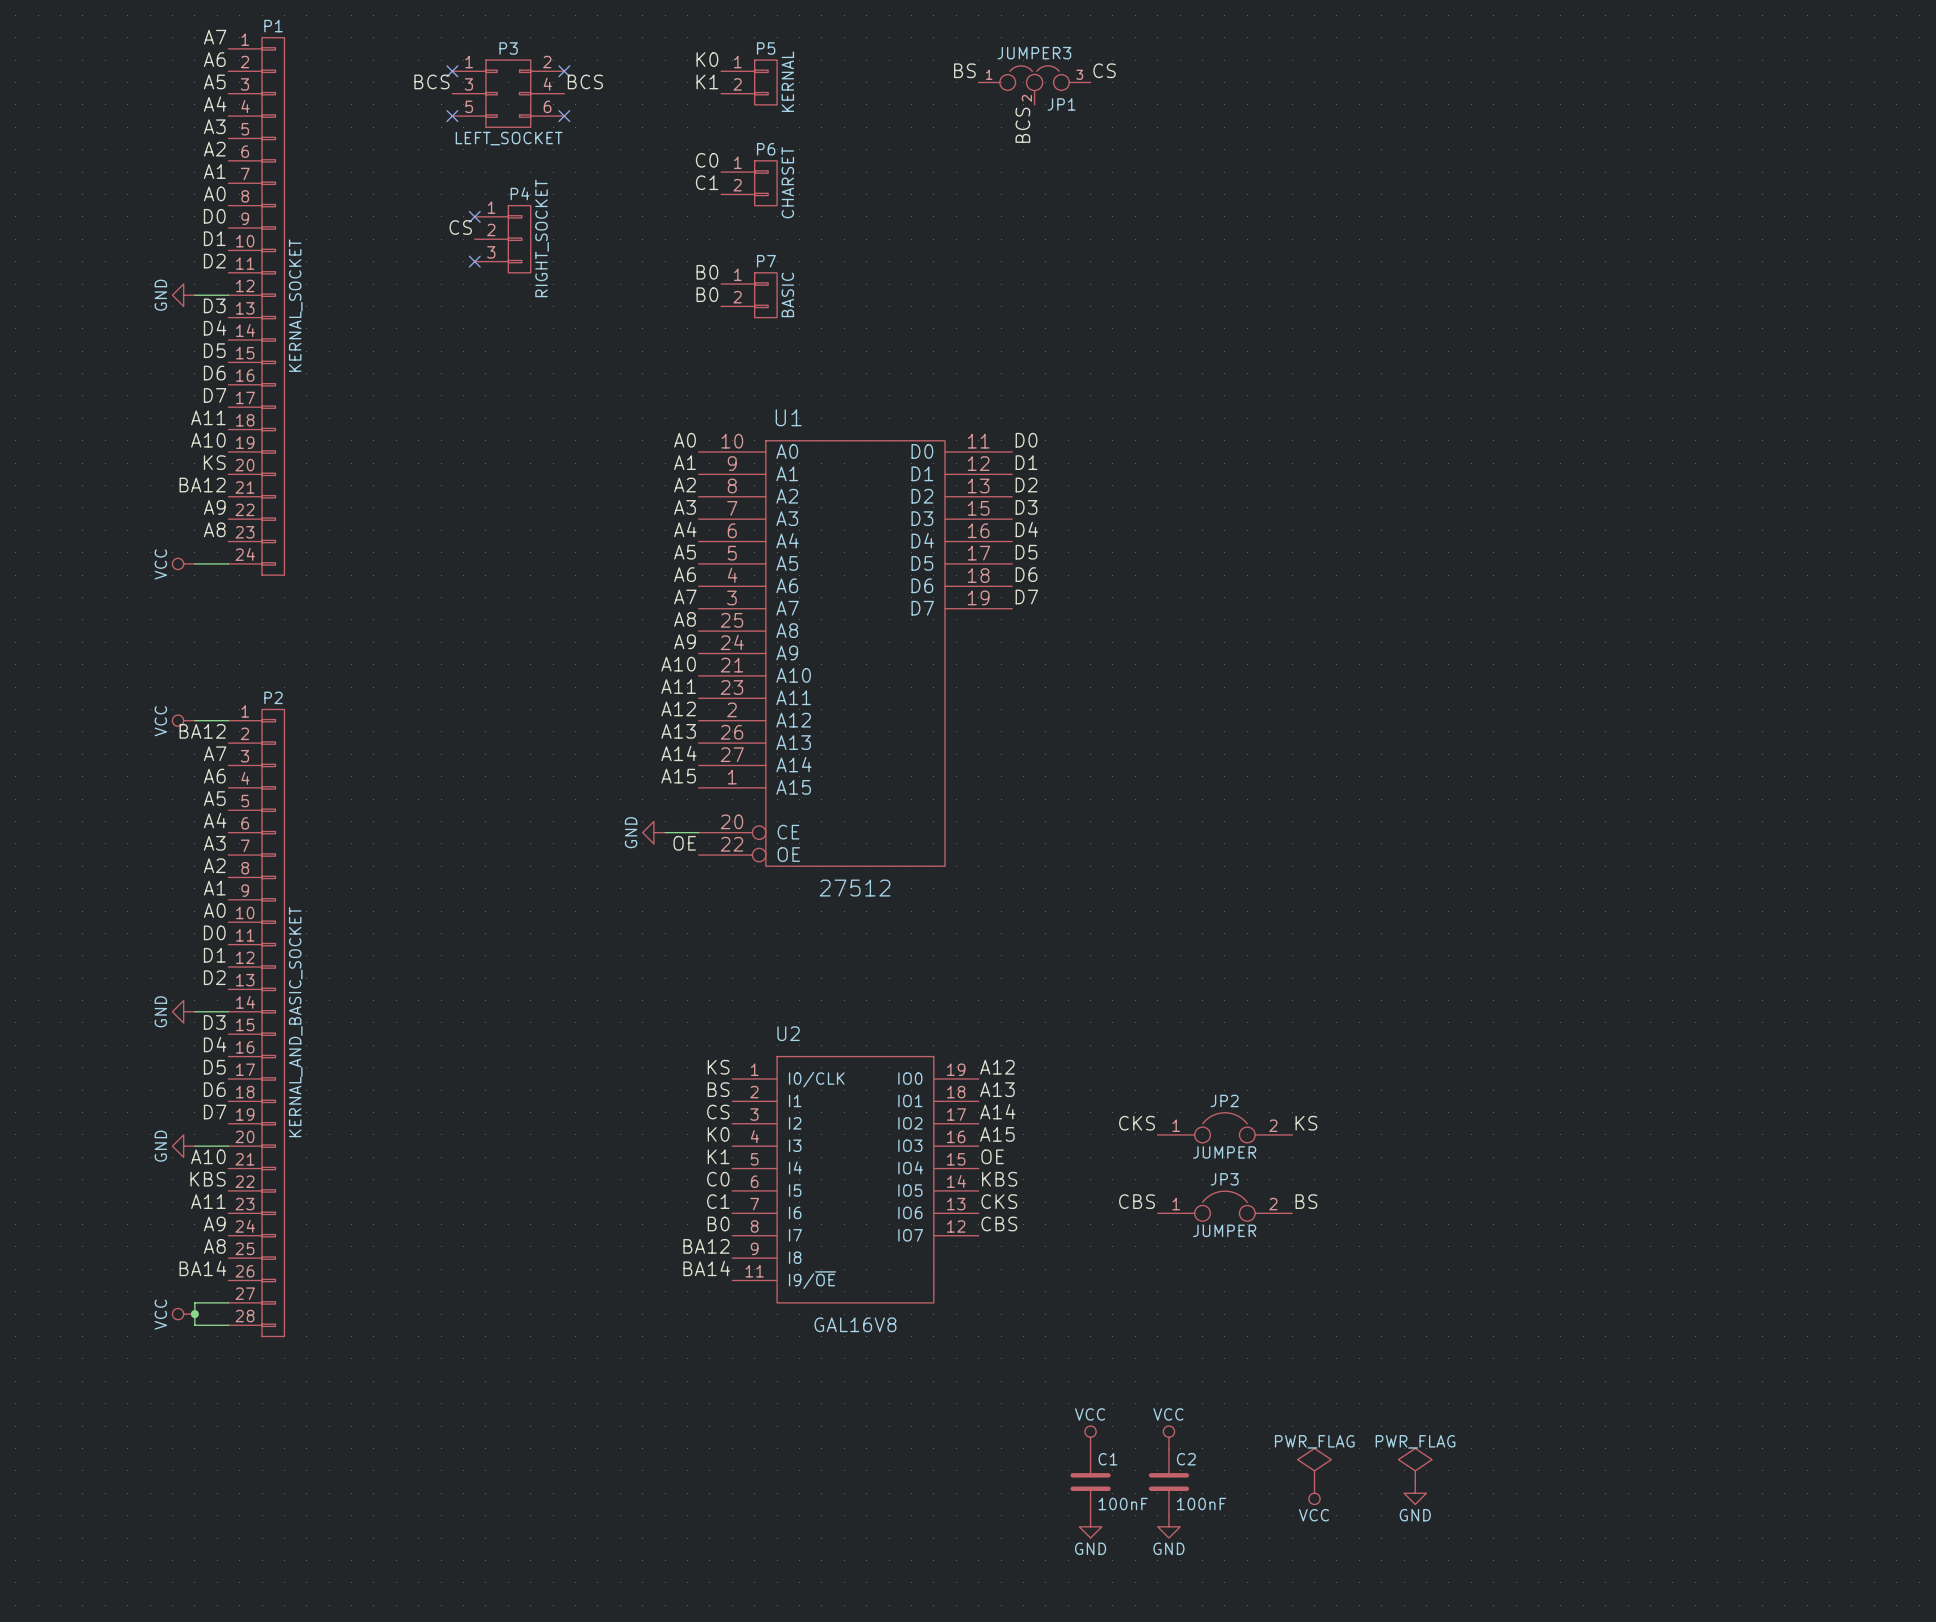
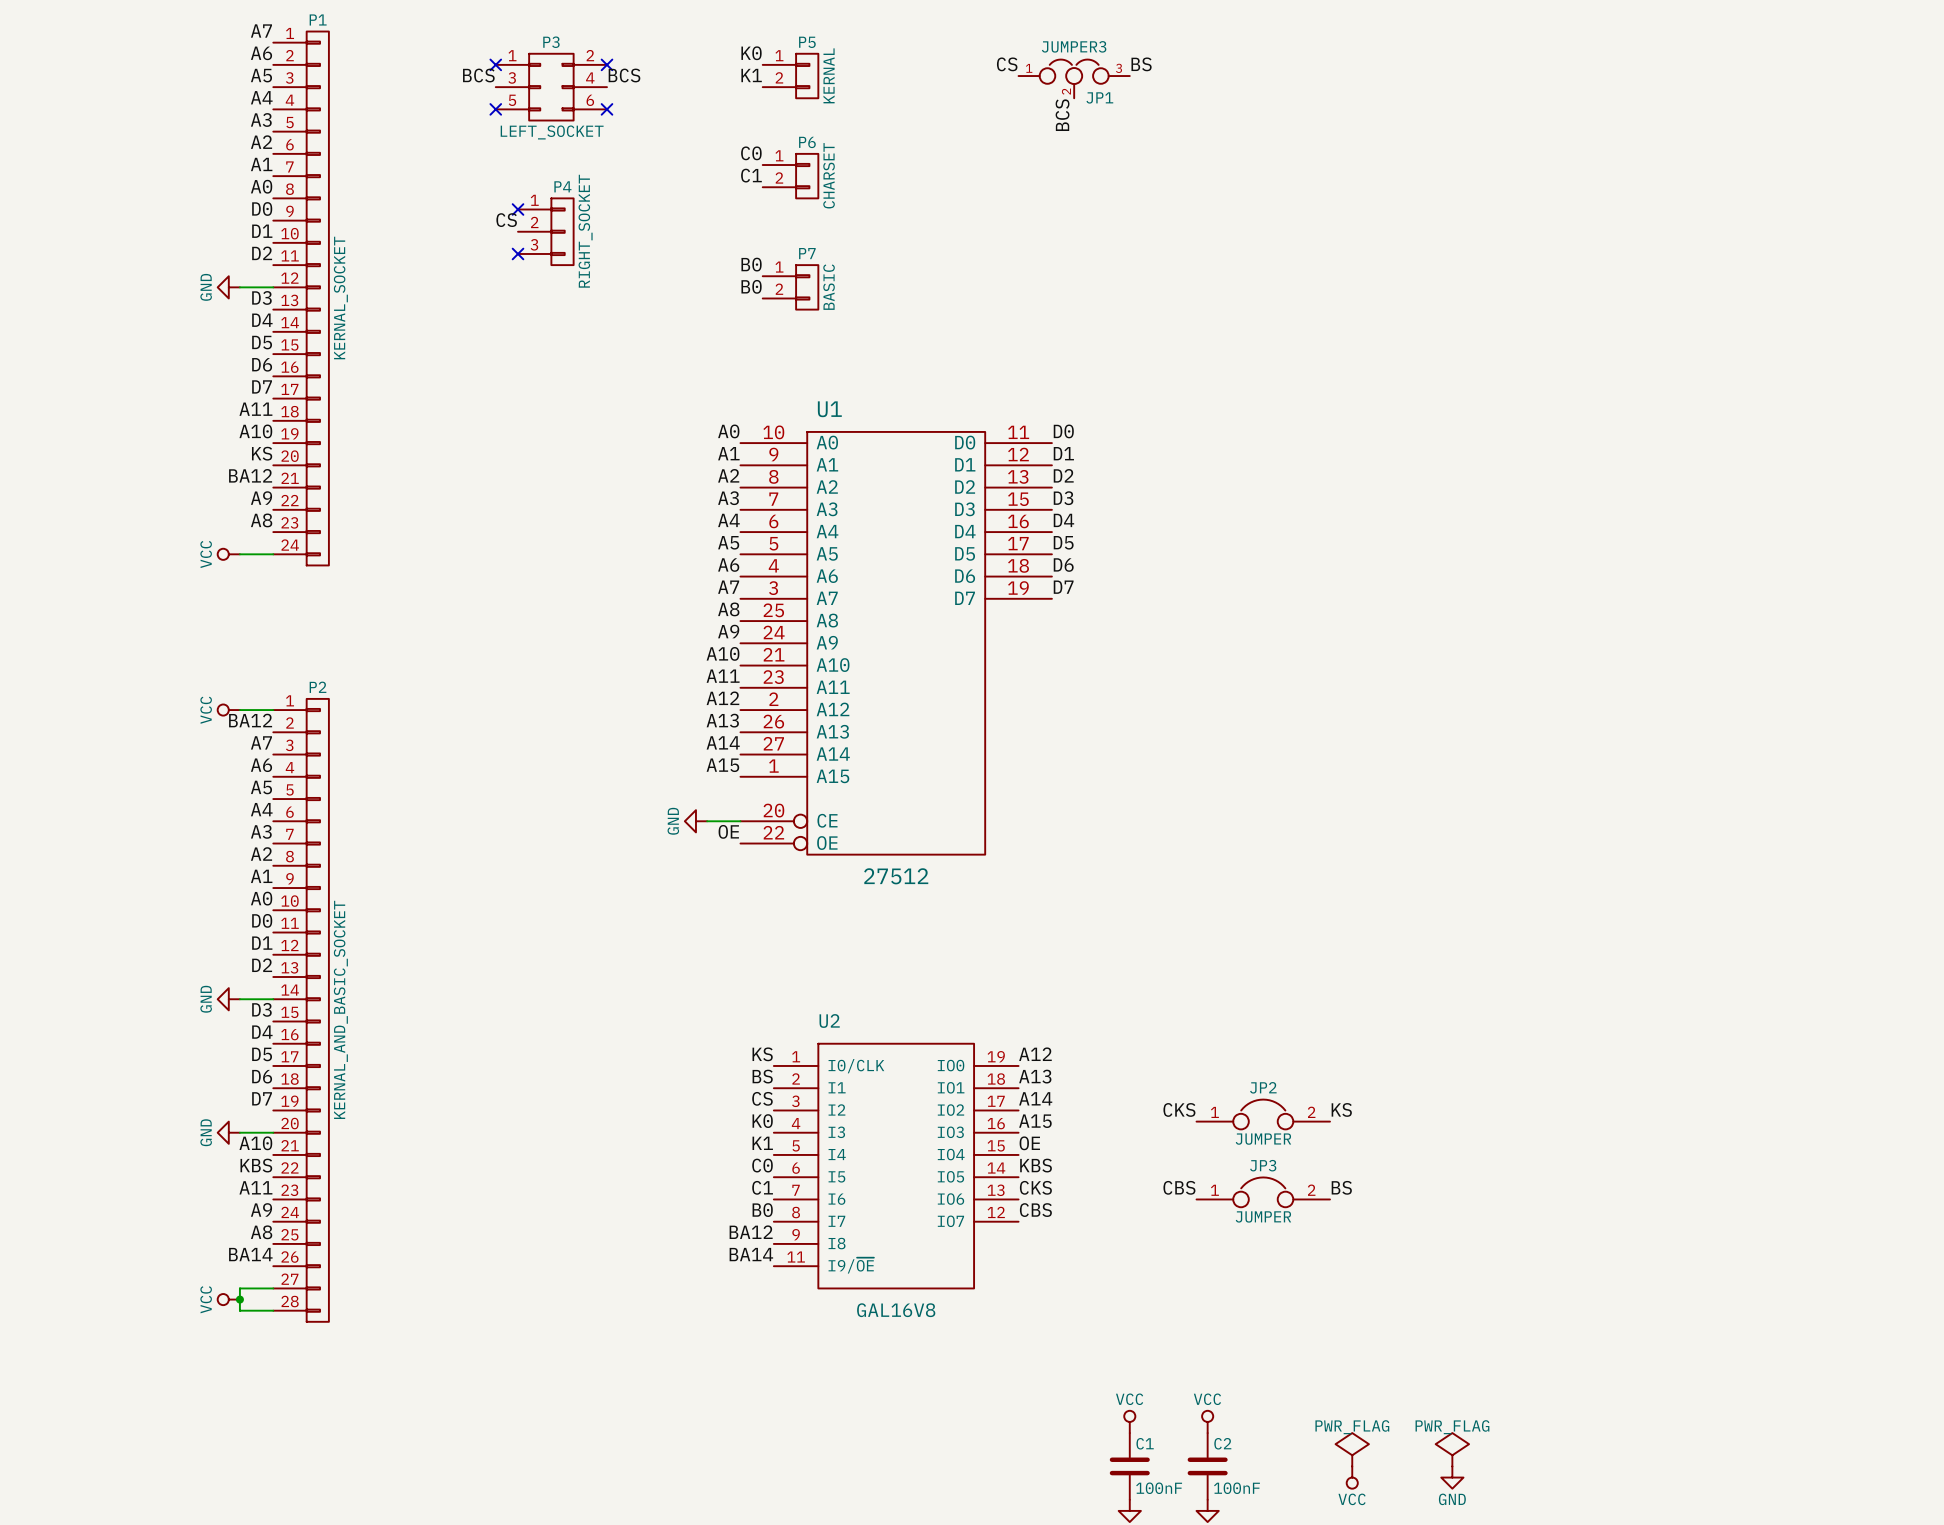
label: BS (964, 70) -> CS (1007, 64)
label: CS (1104, 70) -> BS (1141, 64)

